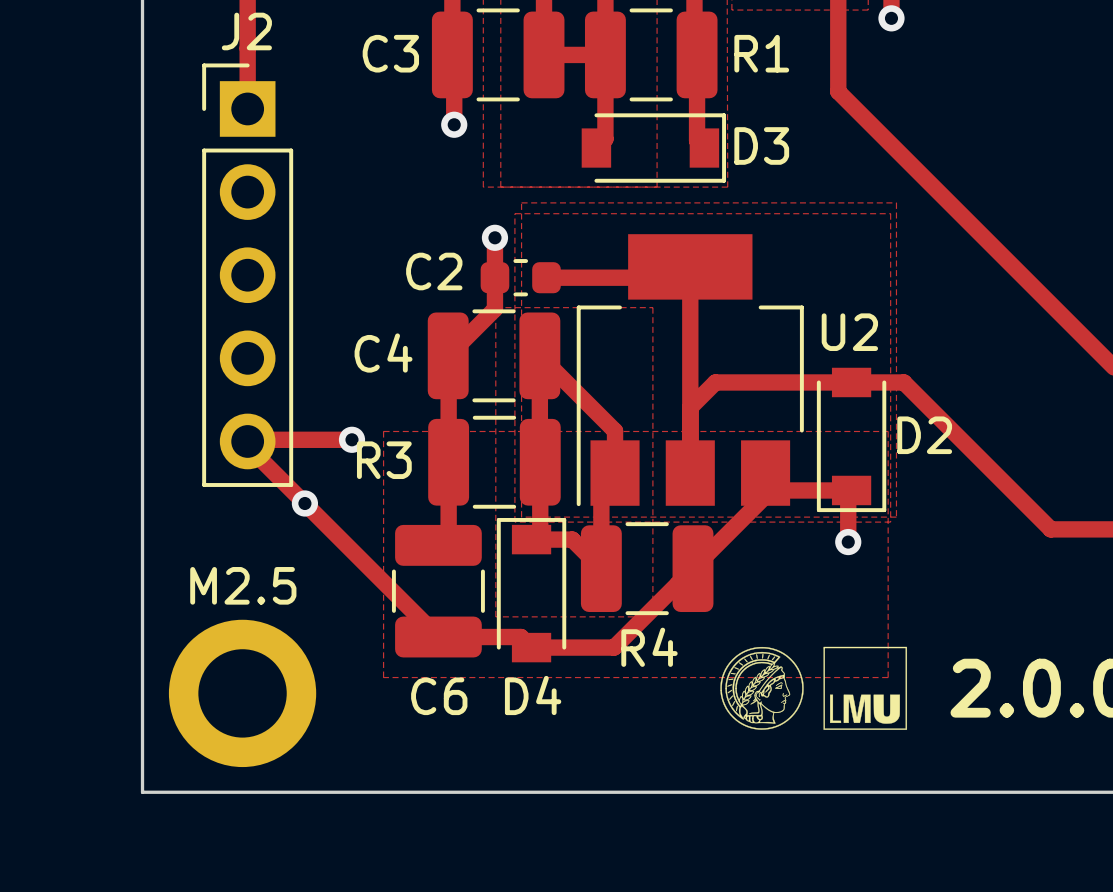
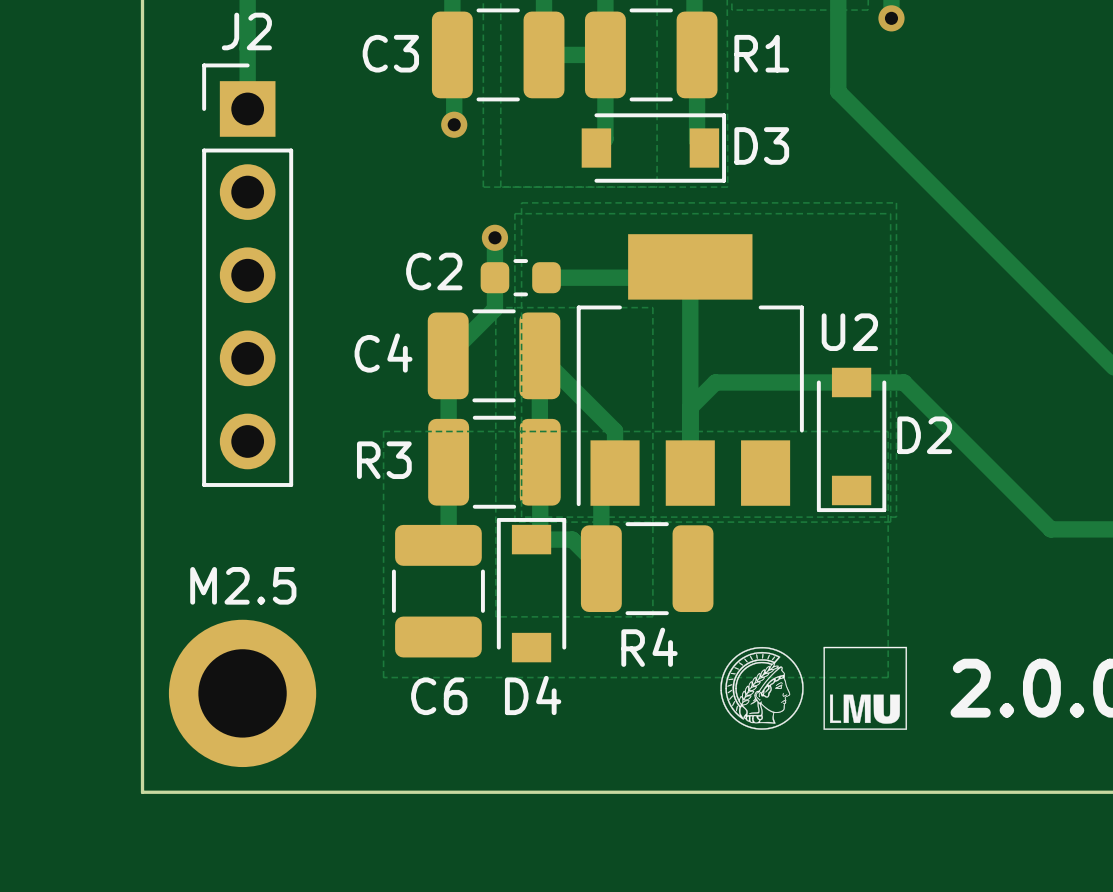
track: (351, 439) (249, 439) (247, 446) (438, 637) (520, 637) (531, 647) (614, 647) (765, 496) (765, 473) (782, 490) (851, 490) (848, 493) (848, 542) -> none
via: (351, 439) -> none
via: (304, 503) -> none
via: (848, 542) -> none

